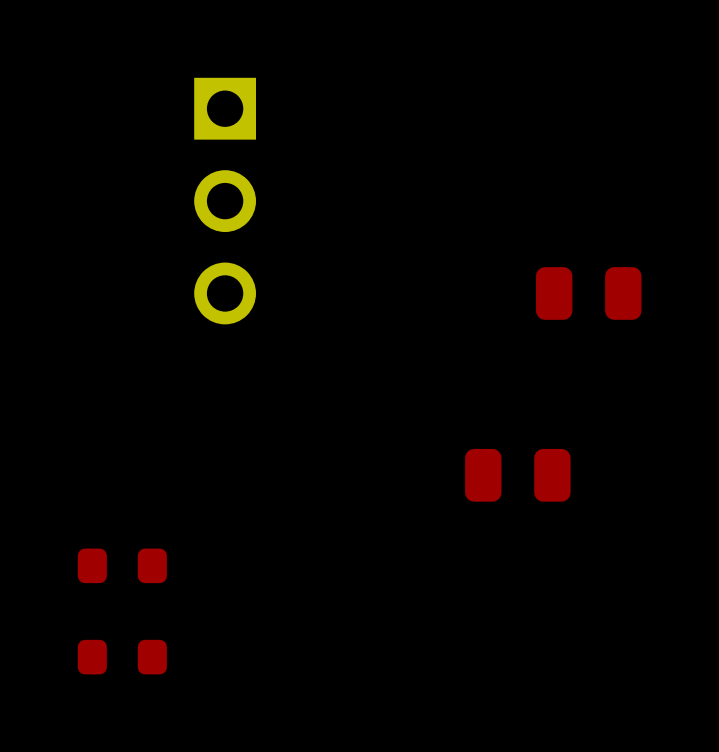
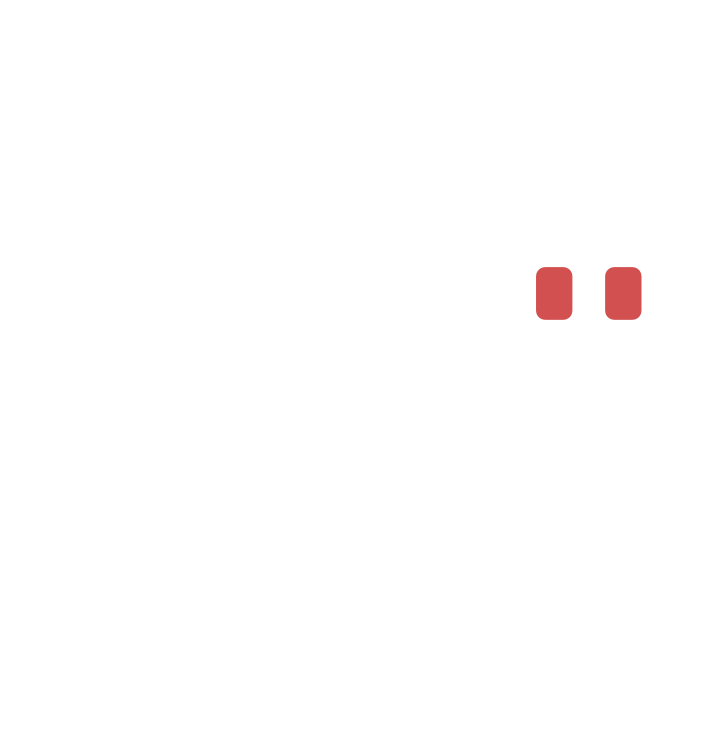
part: (225, 201) -> none
part: (517, 475) -> none
part: (122, 565) -> none
part: (122, 657) -> none

